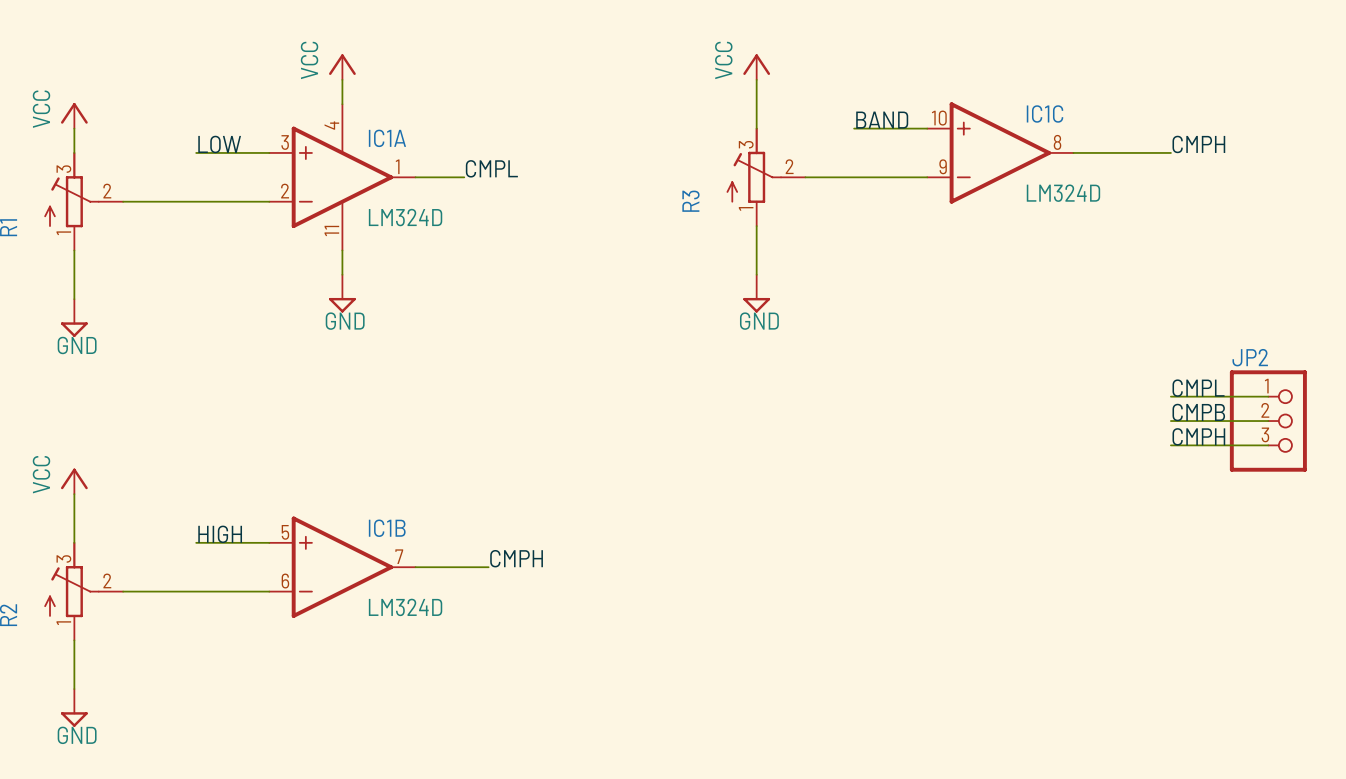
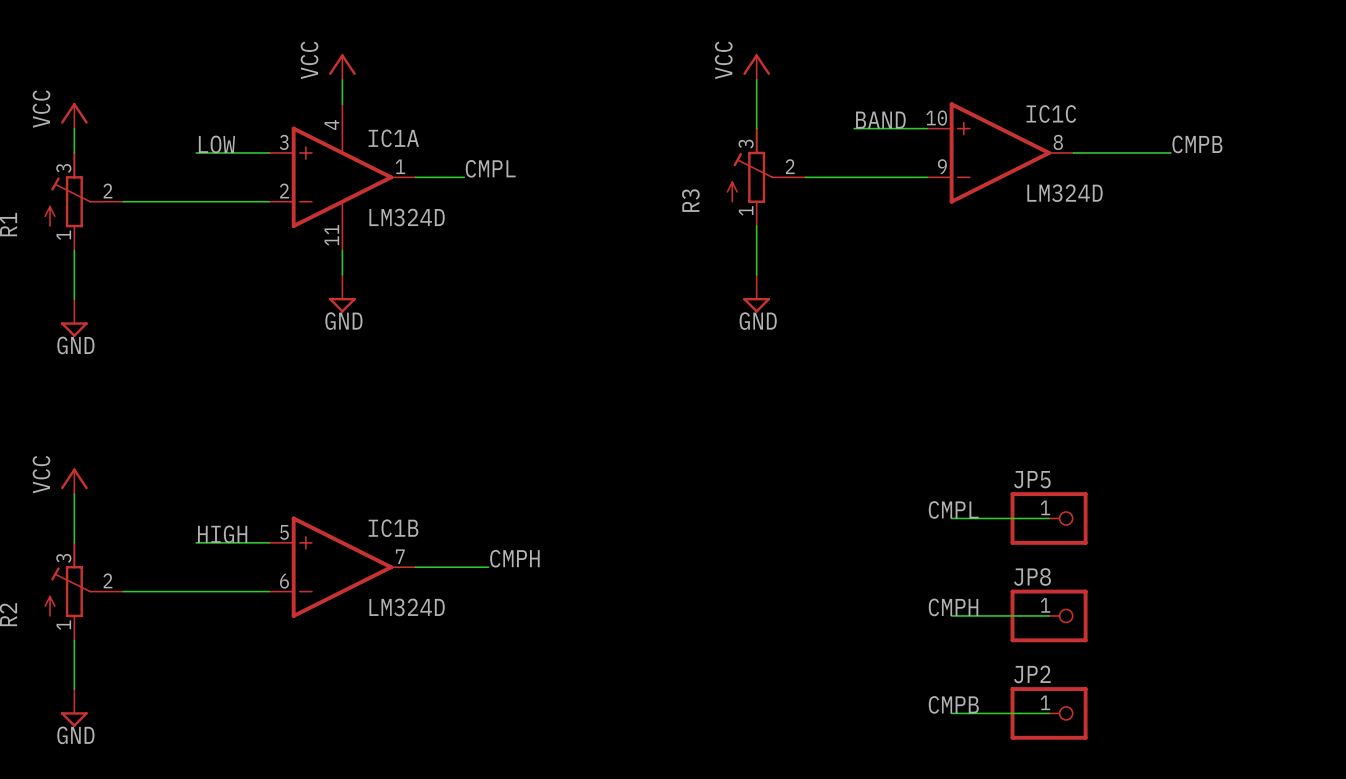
label: CMPH (1198, 144) -> CMPB (1197, 144)
JP2 name position: JP2 (1250, 357) -> JP2 (1032, 674)
JP2 symbol: [1229, 370, 1307, 472] -> [1010, 687, 1088, 740]
label: CMPL (1198, 388) -> none
wire: (1170, 396) (1268, 396) -> none
label: CMPB (1198, 412) -> none
wire: (1170, 421) (1268, 421) -> none
label: CMPH (1198, 436) -> none
wire: (1170, 445) (1268, 445) -> (951, 518) (1049, 518)
label: none -> CMPL (953, 509)
JP5: none -> (1049, 518)
label: none -> CMPH (953, 607)
wire: none -> (951, 615) (1049, 615)
JP8: none -> (1049, 615)
label: none -> CMPB (953, 704)
wire: none -> (951, 713) (1049, 713)

